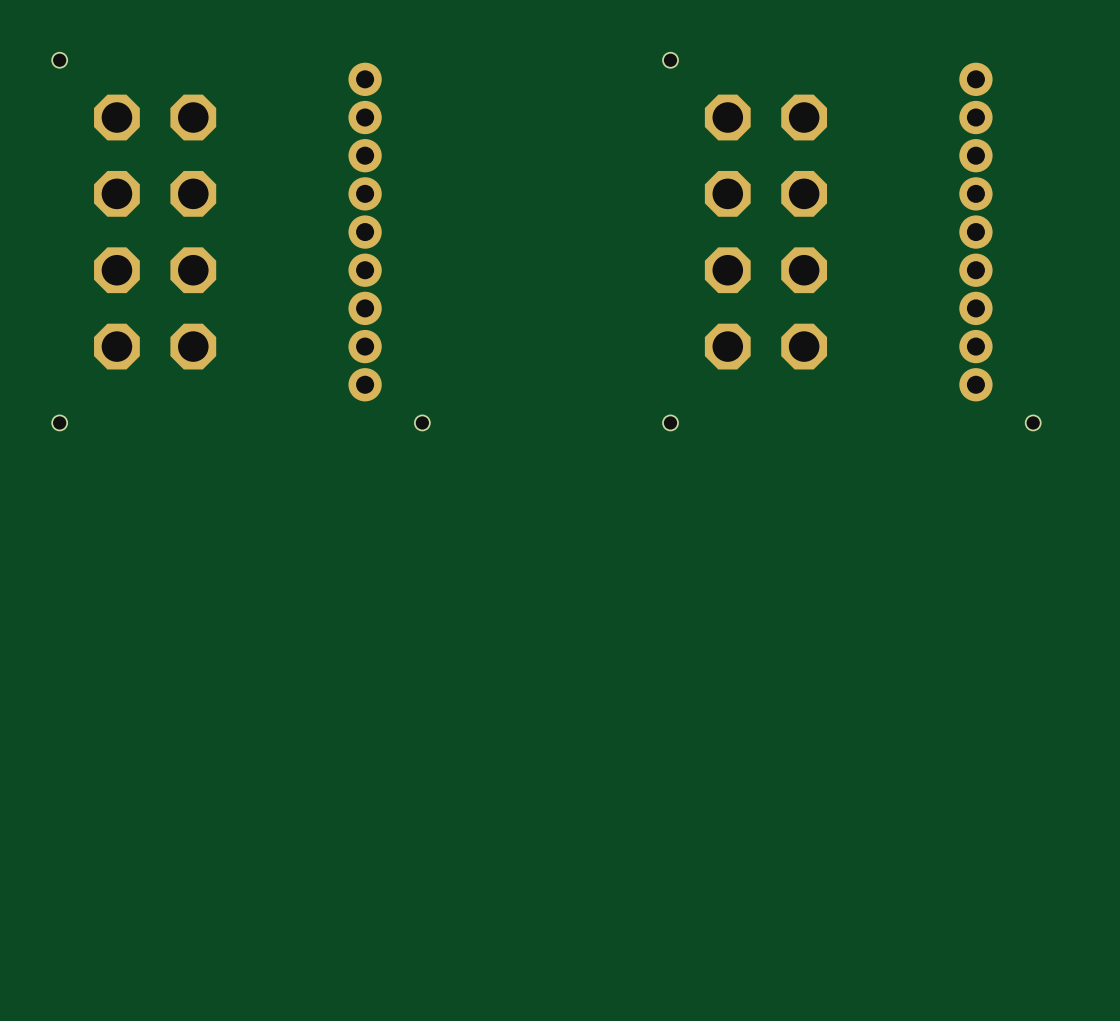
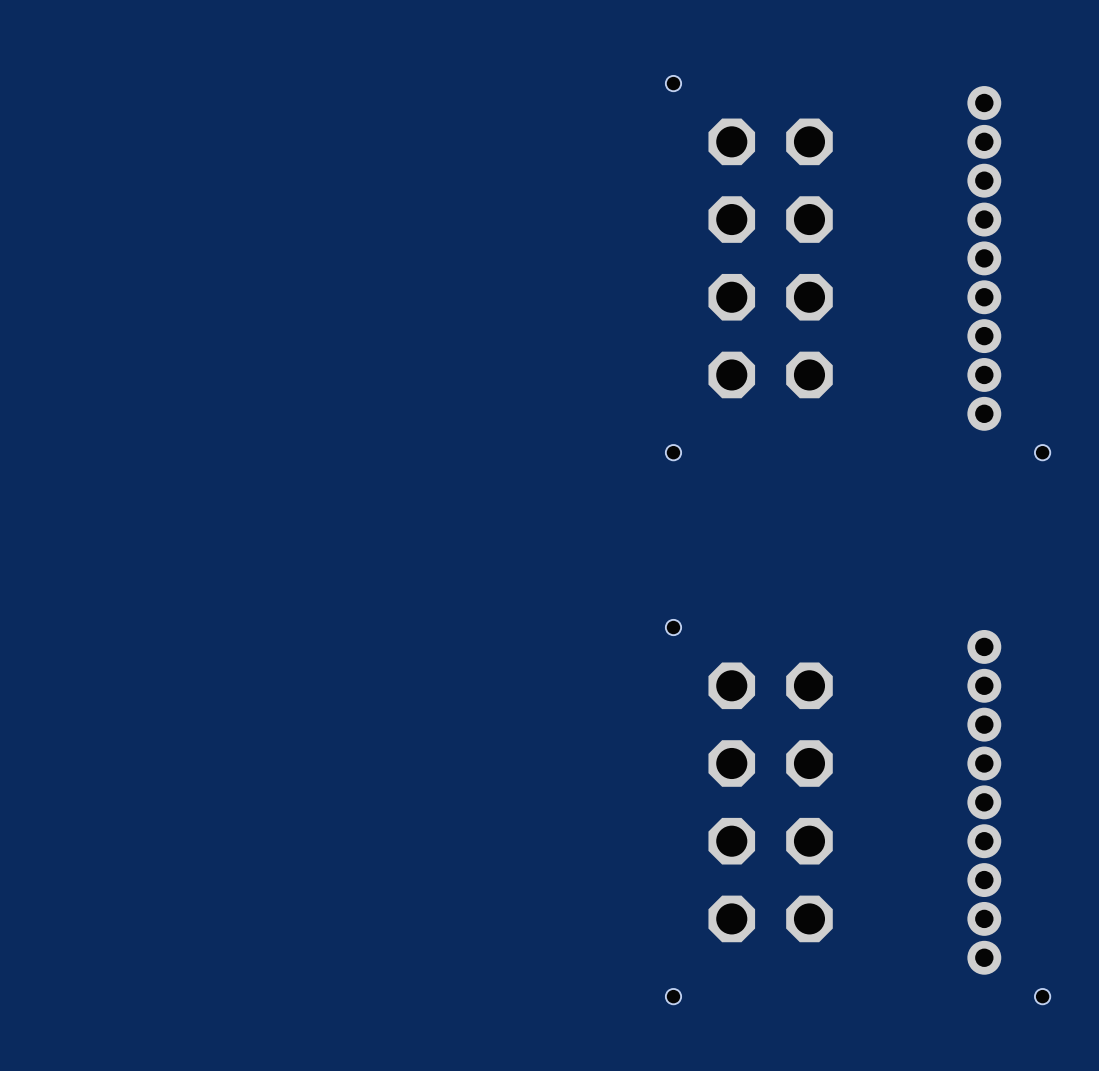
hole: (59, 60) -> none
part: (155, 232) -> none
part: (365, 232) -> none
hole: (59, 422) -> none
hole: (422, 422) -> none
hole: none -> (673, 627)
part: none -> (770, 802)
part: none -> (984, 802)
hole: none -> (673, 996)
hole: none -> (1042, 996)

